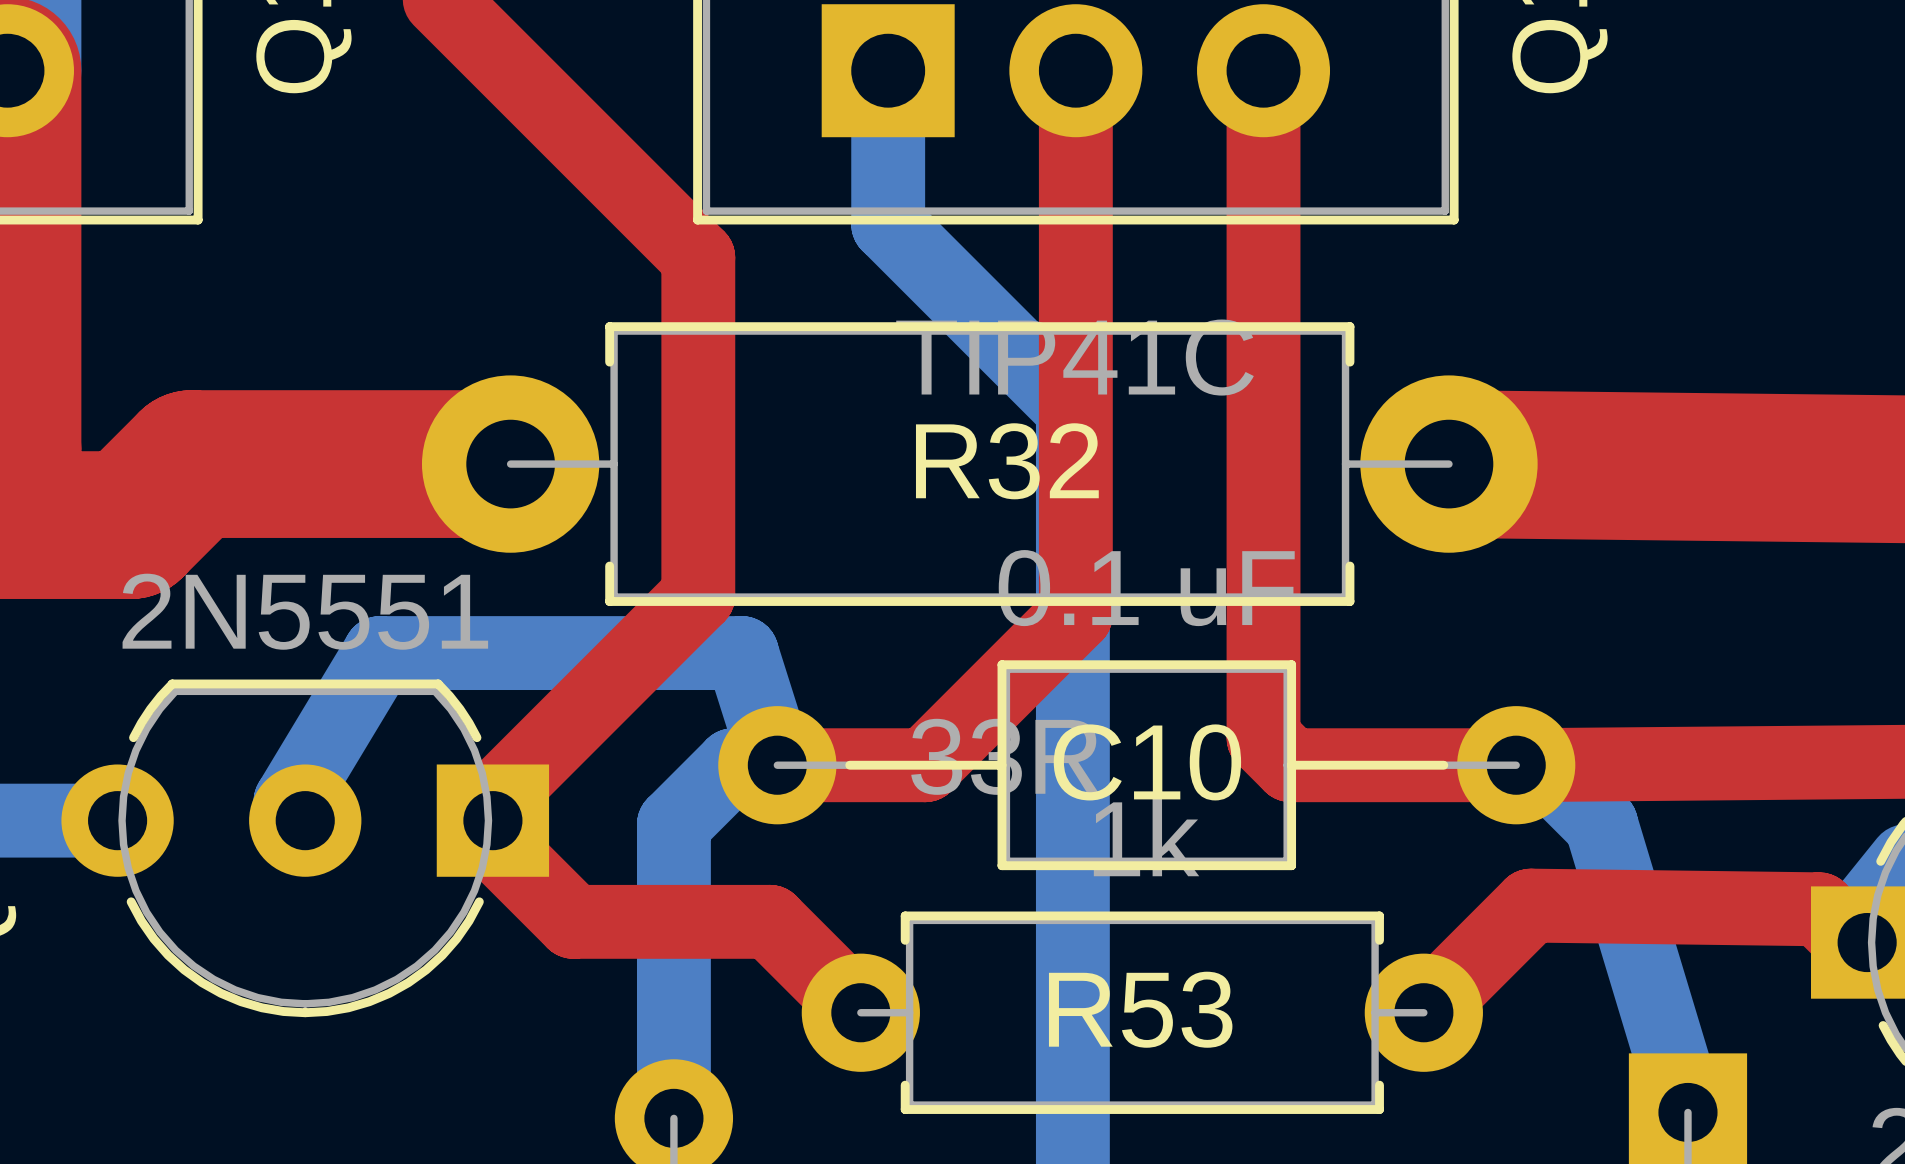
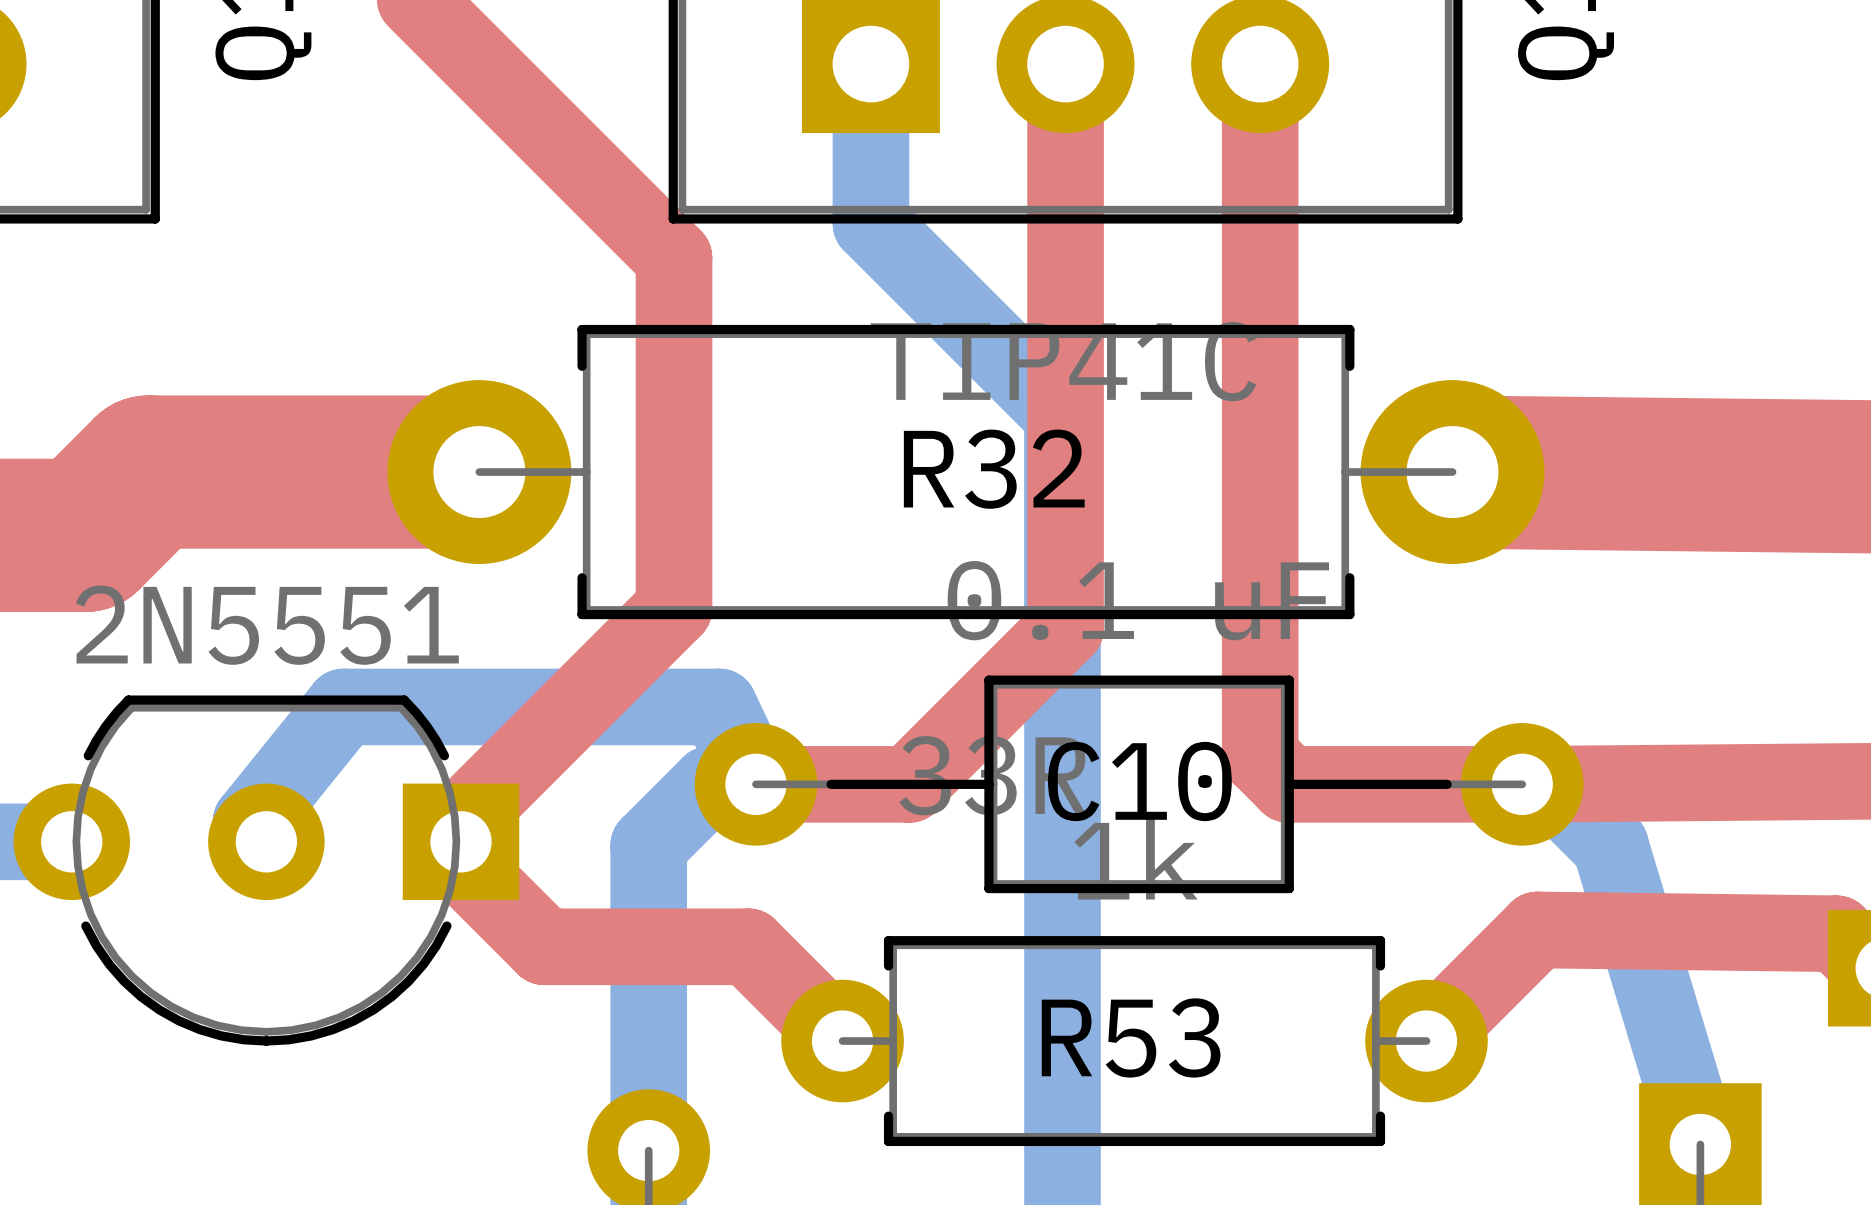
bottom track: (777, 765) (741, 653) (379, 653) (290, 801) -> (756, 784) (719, 706) (343, 706) (251, 821)

